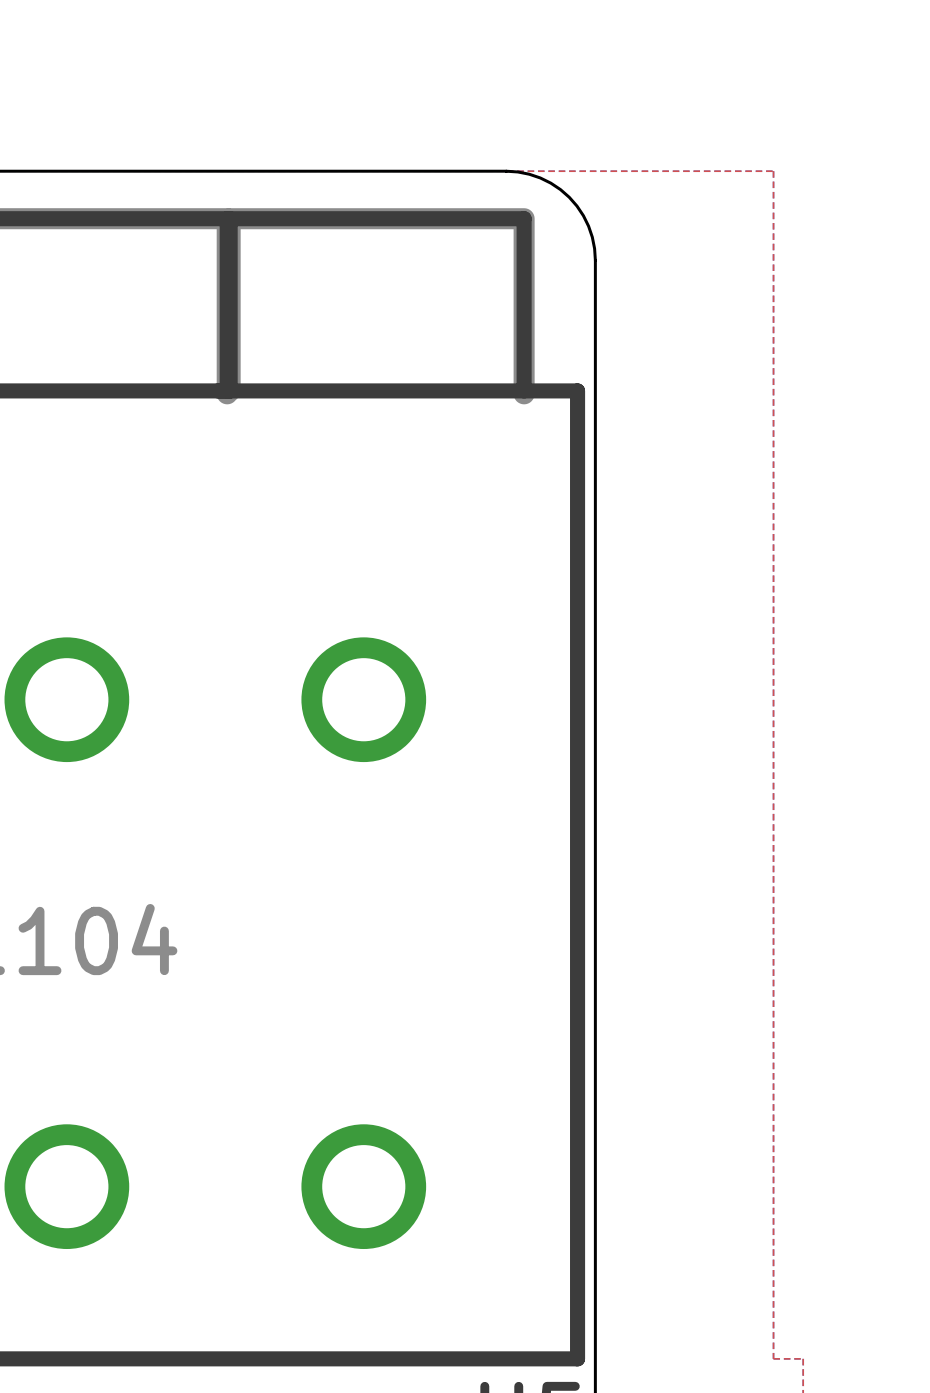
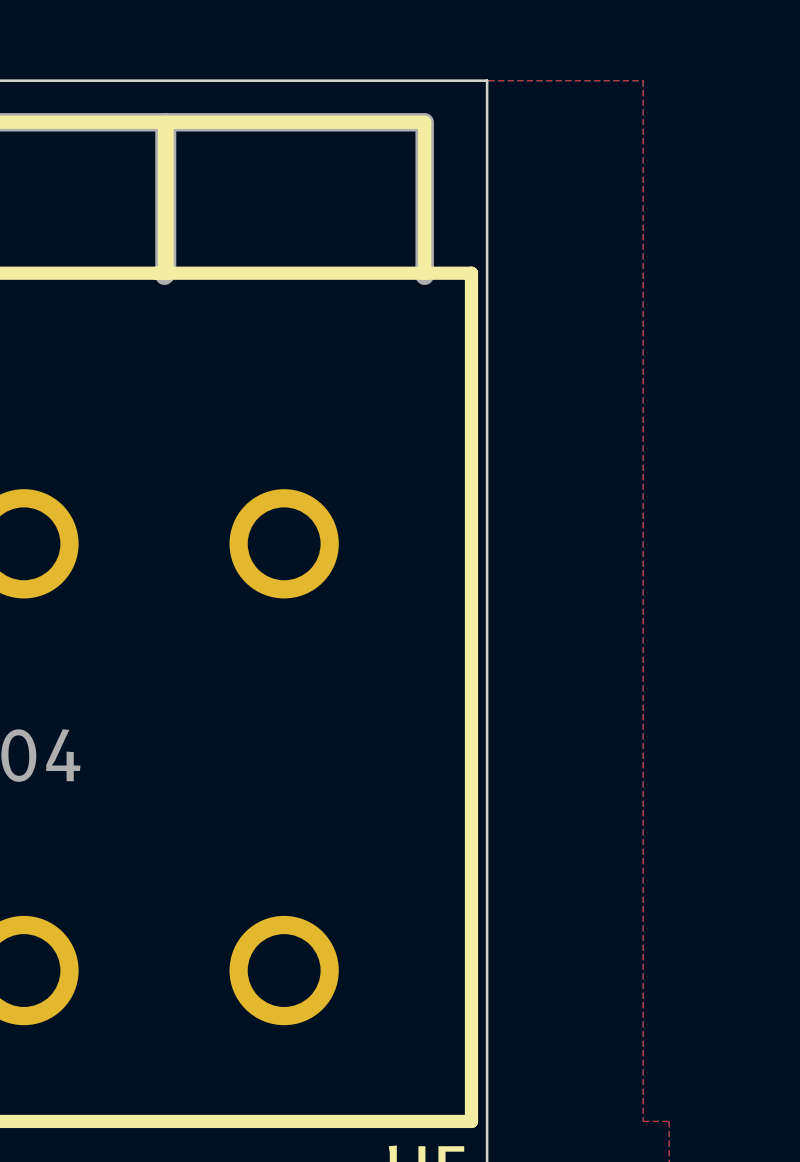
board edge: (506, 171) (529, 174) (540, 177) (550, 183) (569, 197) (583, 215) (588, 226) (594, 248) (595, 260) -> (409, 80) (487, 80) (487, 158)

